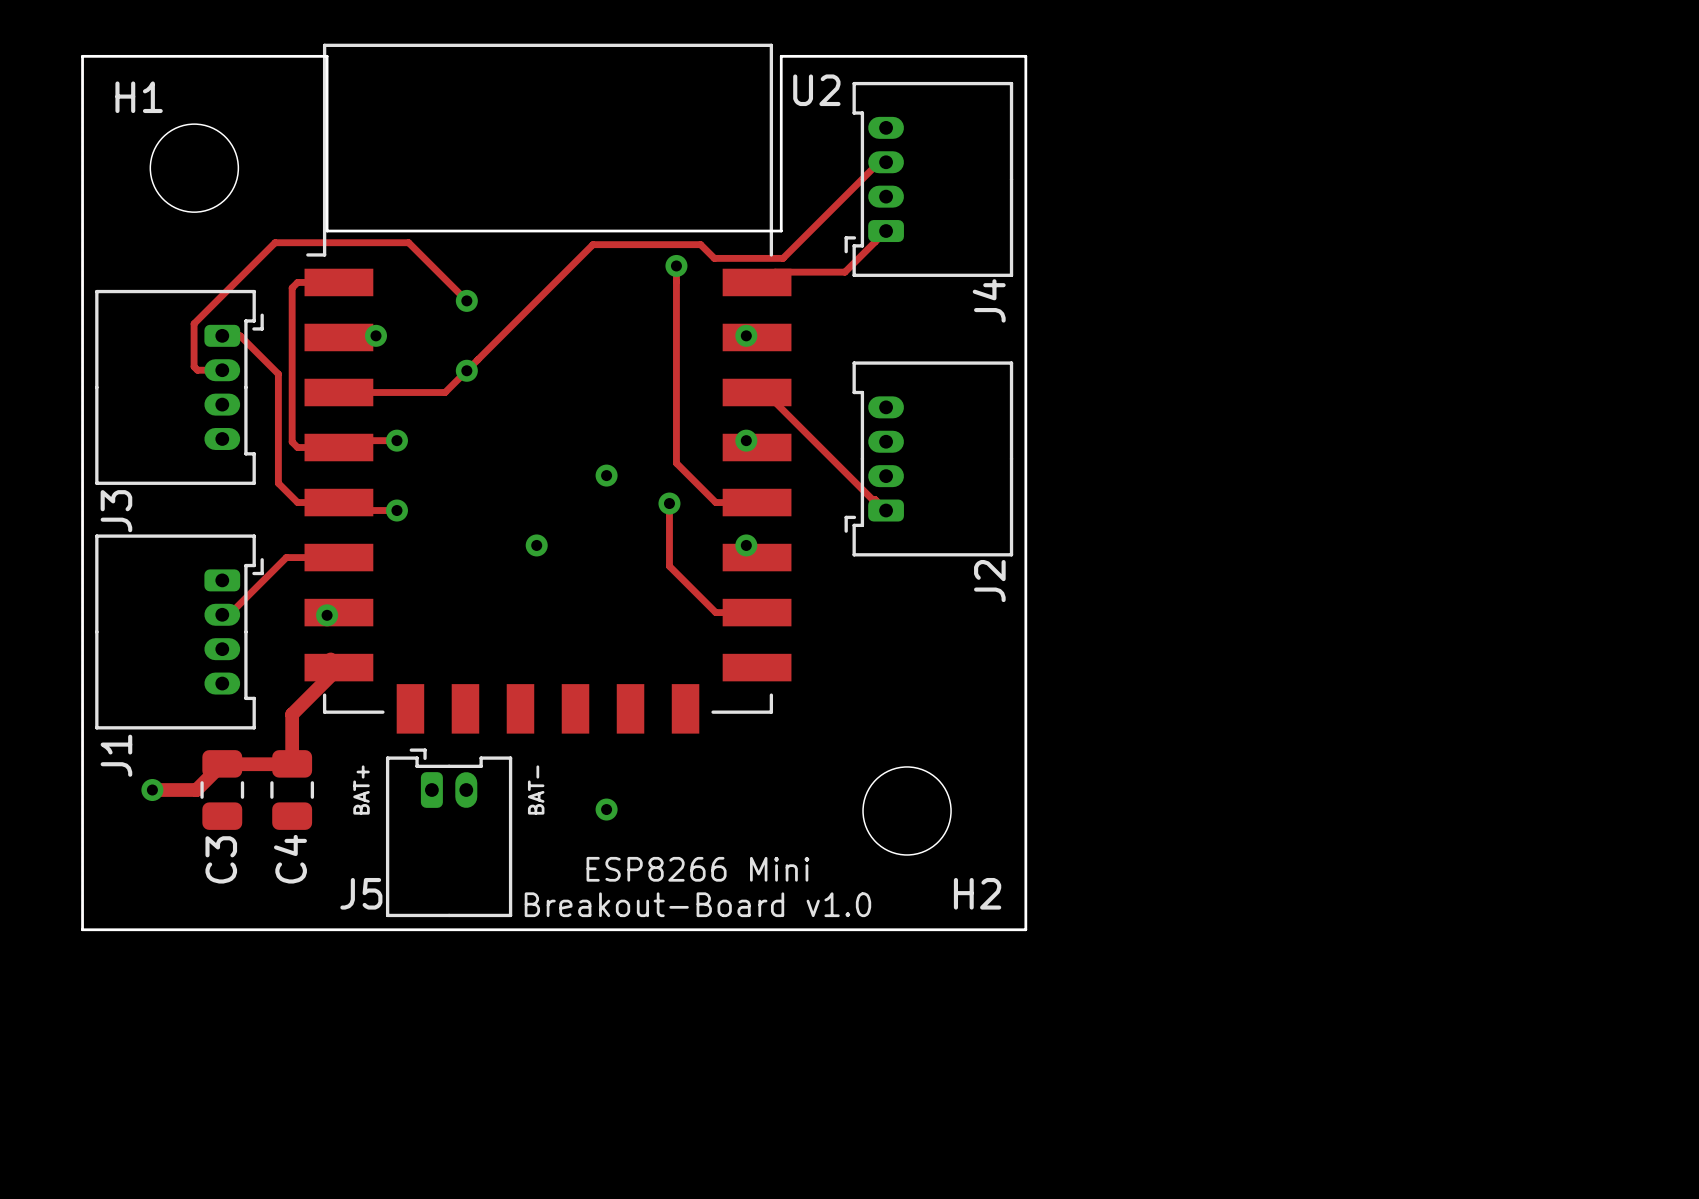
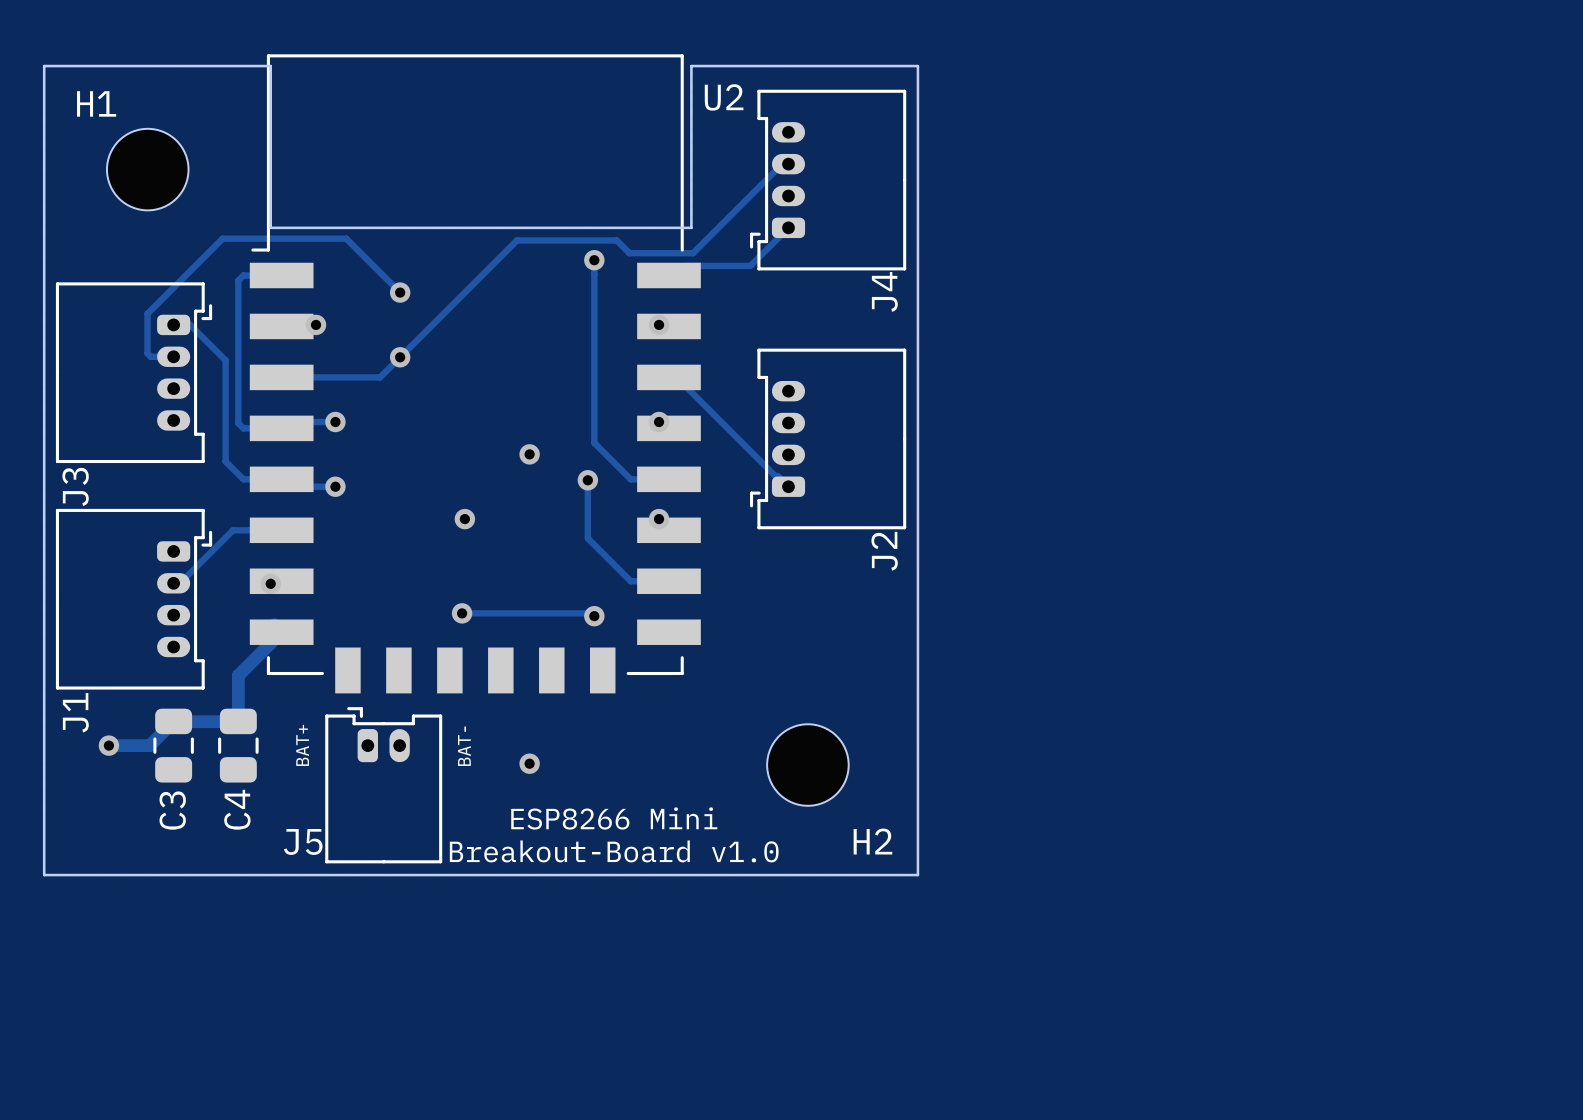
track: none -> (462, 613) (591, 613) (594, 616)
via: none -> (462, 613)
via: none -> (594, 616)

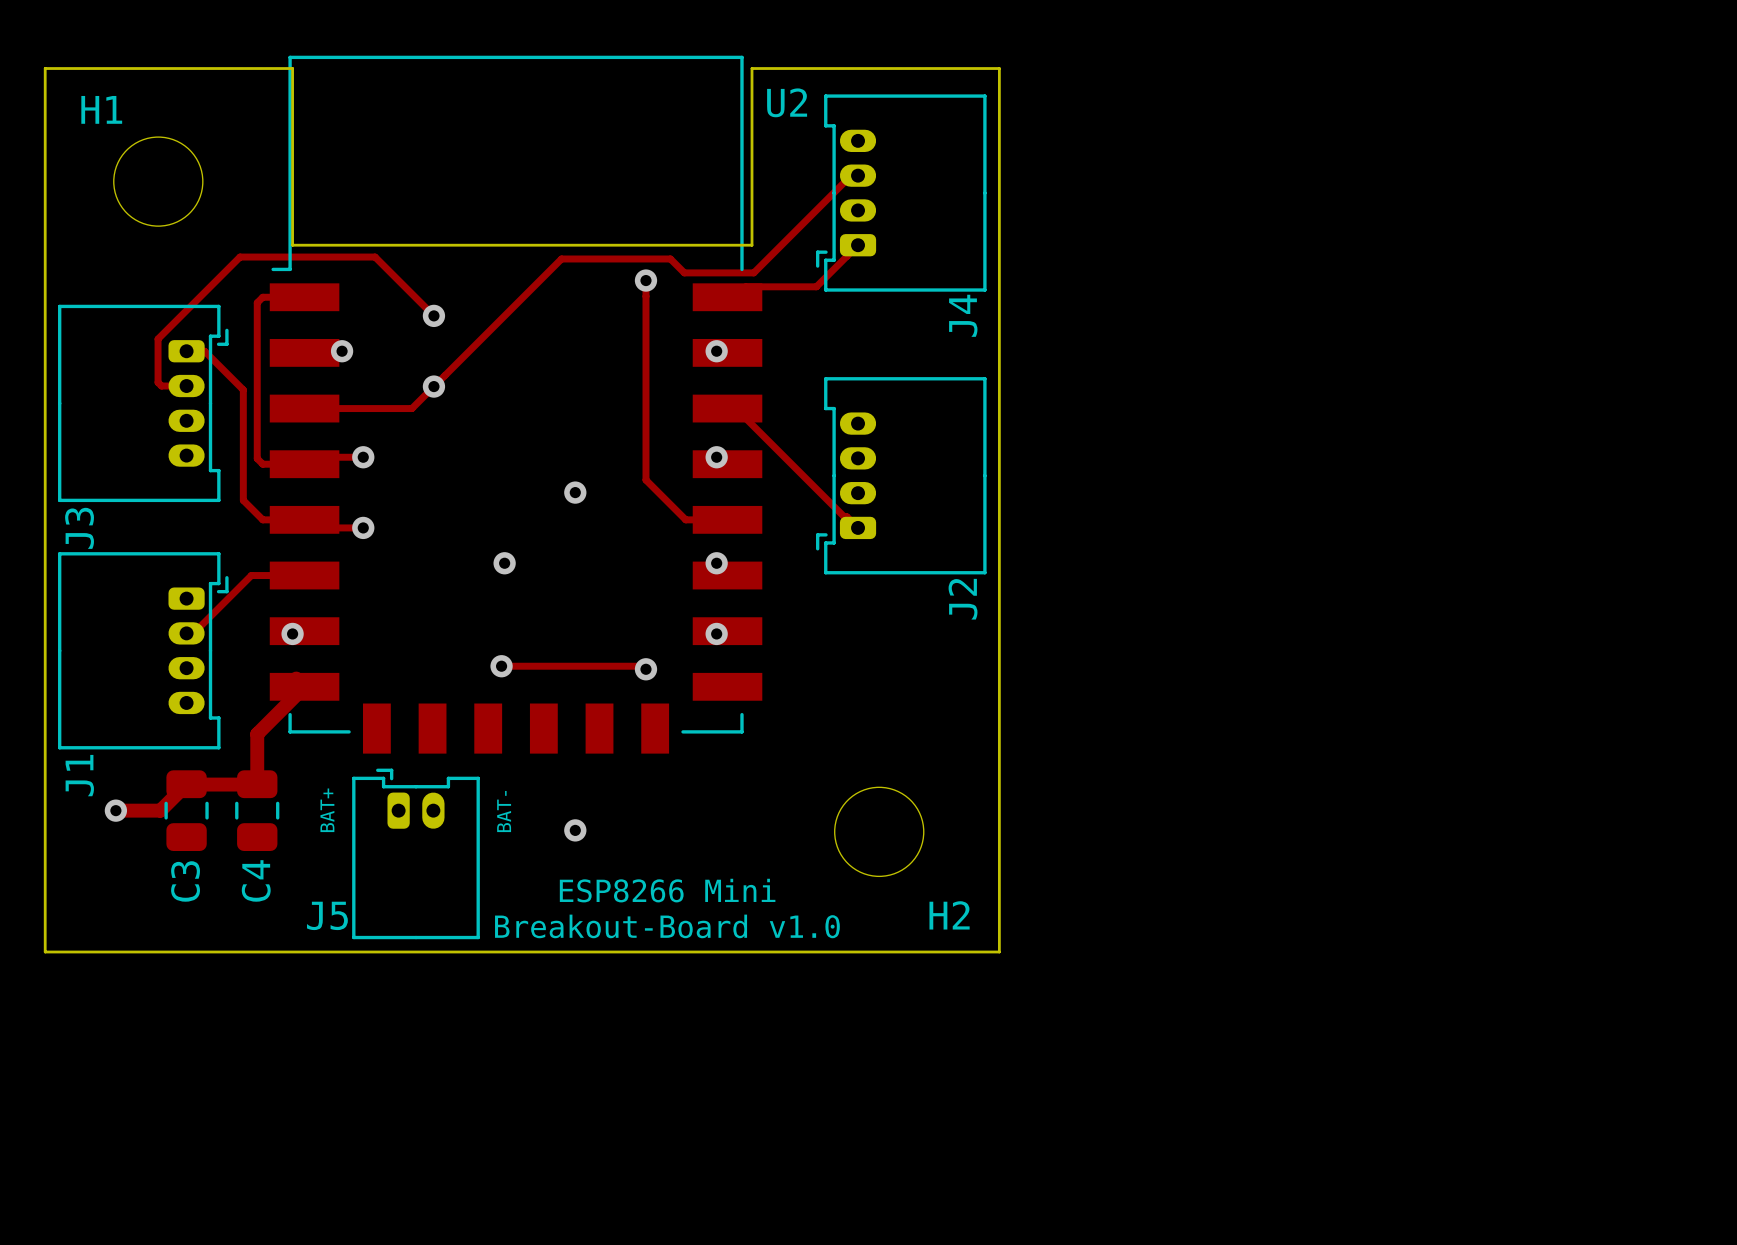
track: (587, 480) (587, 538) (630, 581) (668, 581) -> none
via position: (587, 480) -> (716, 633)

